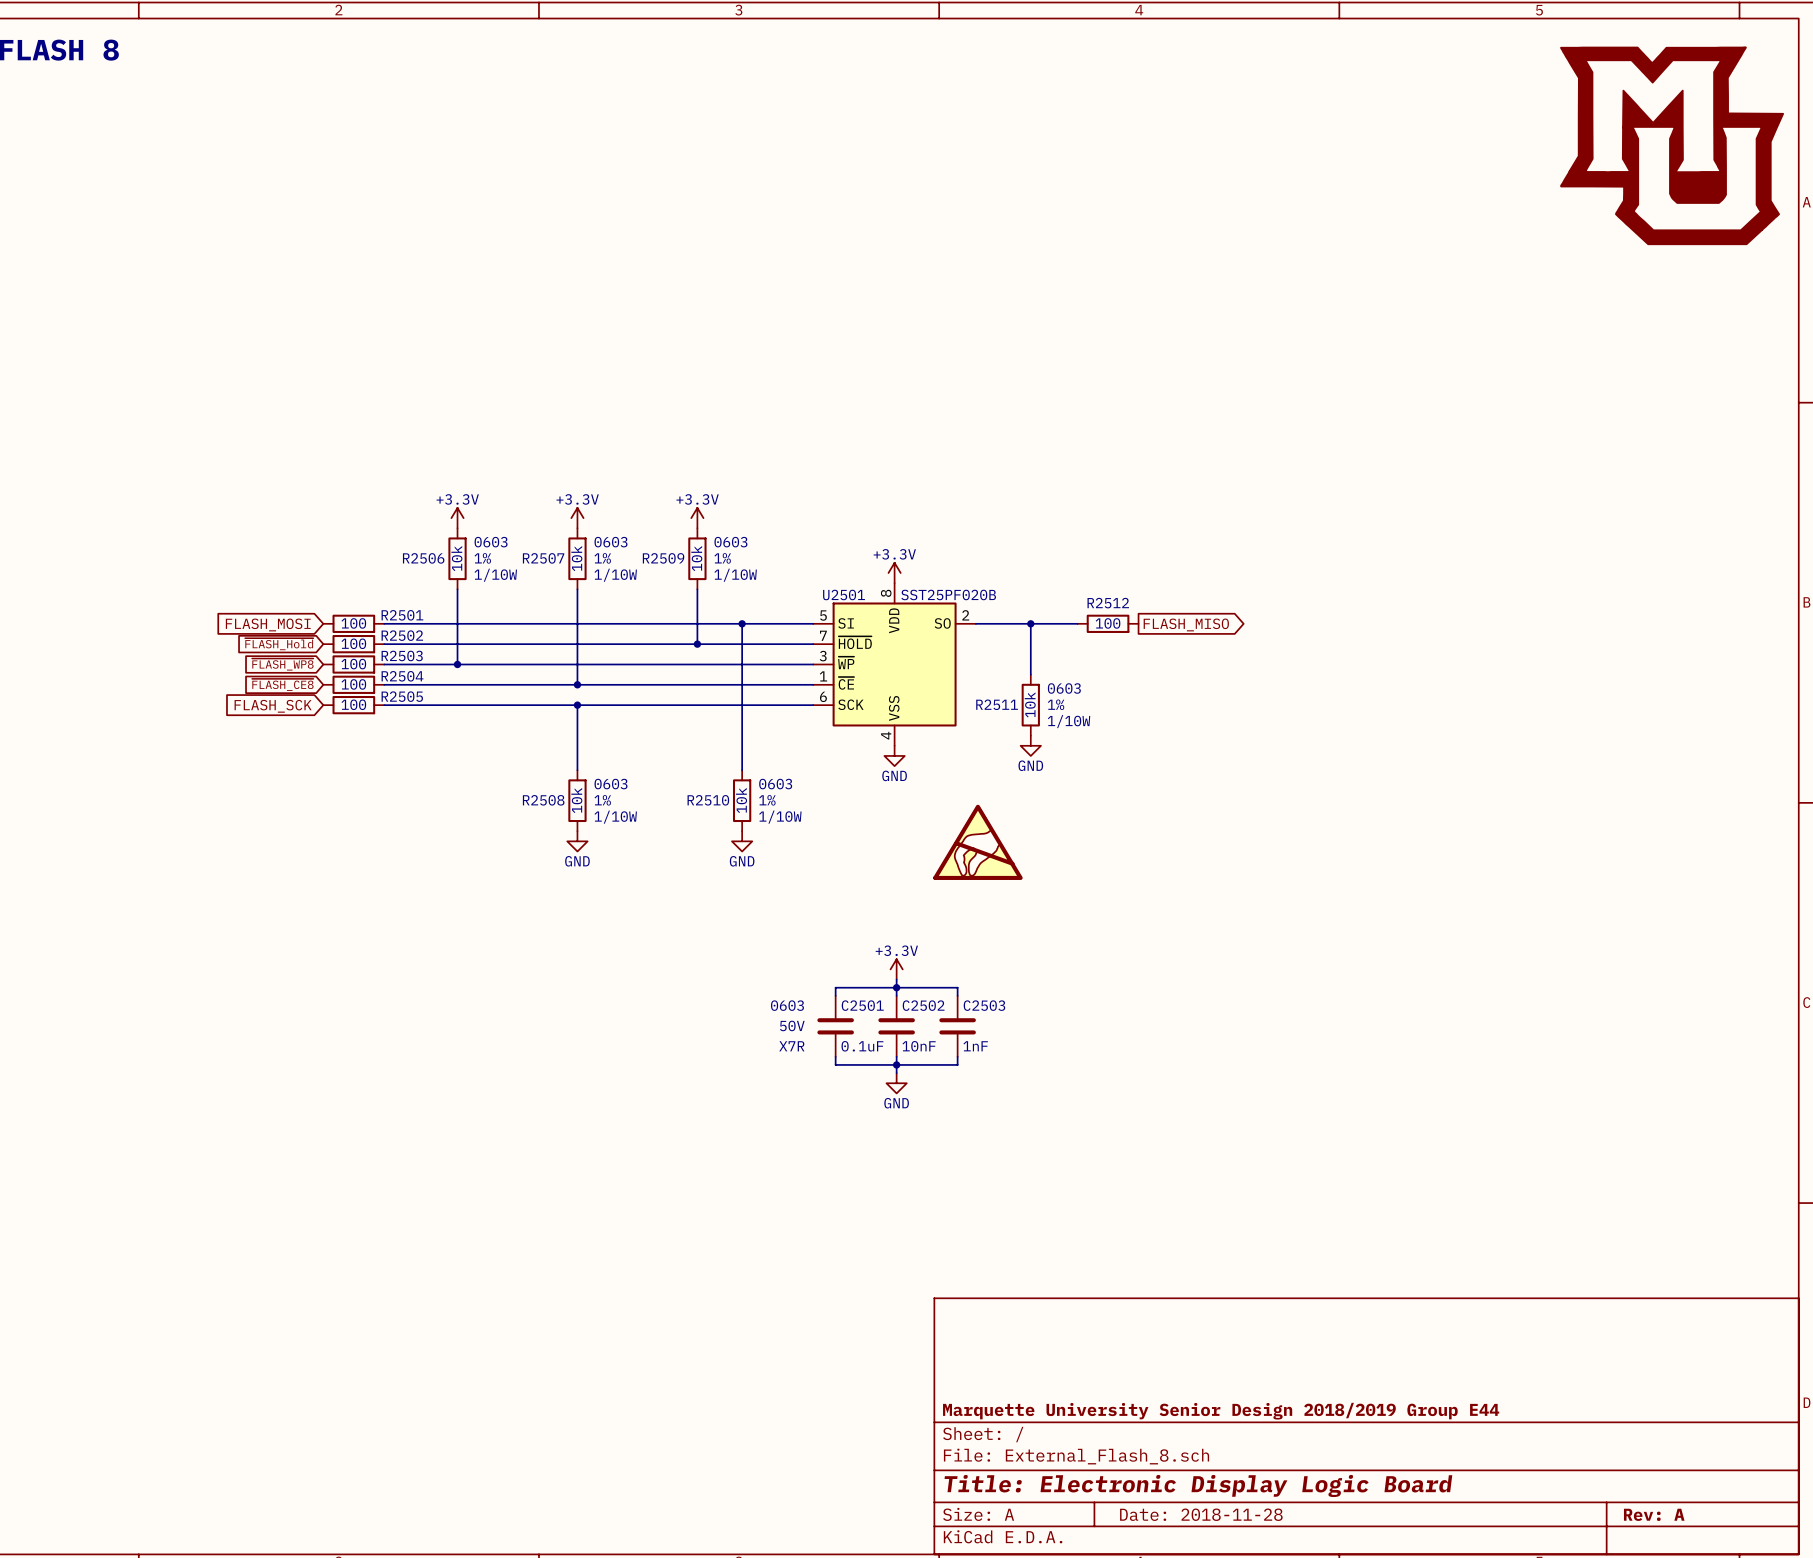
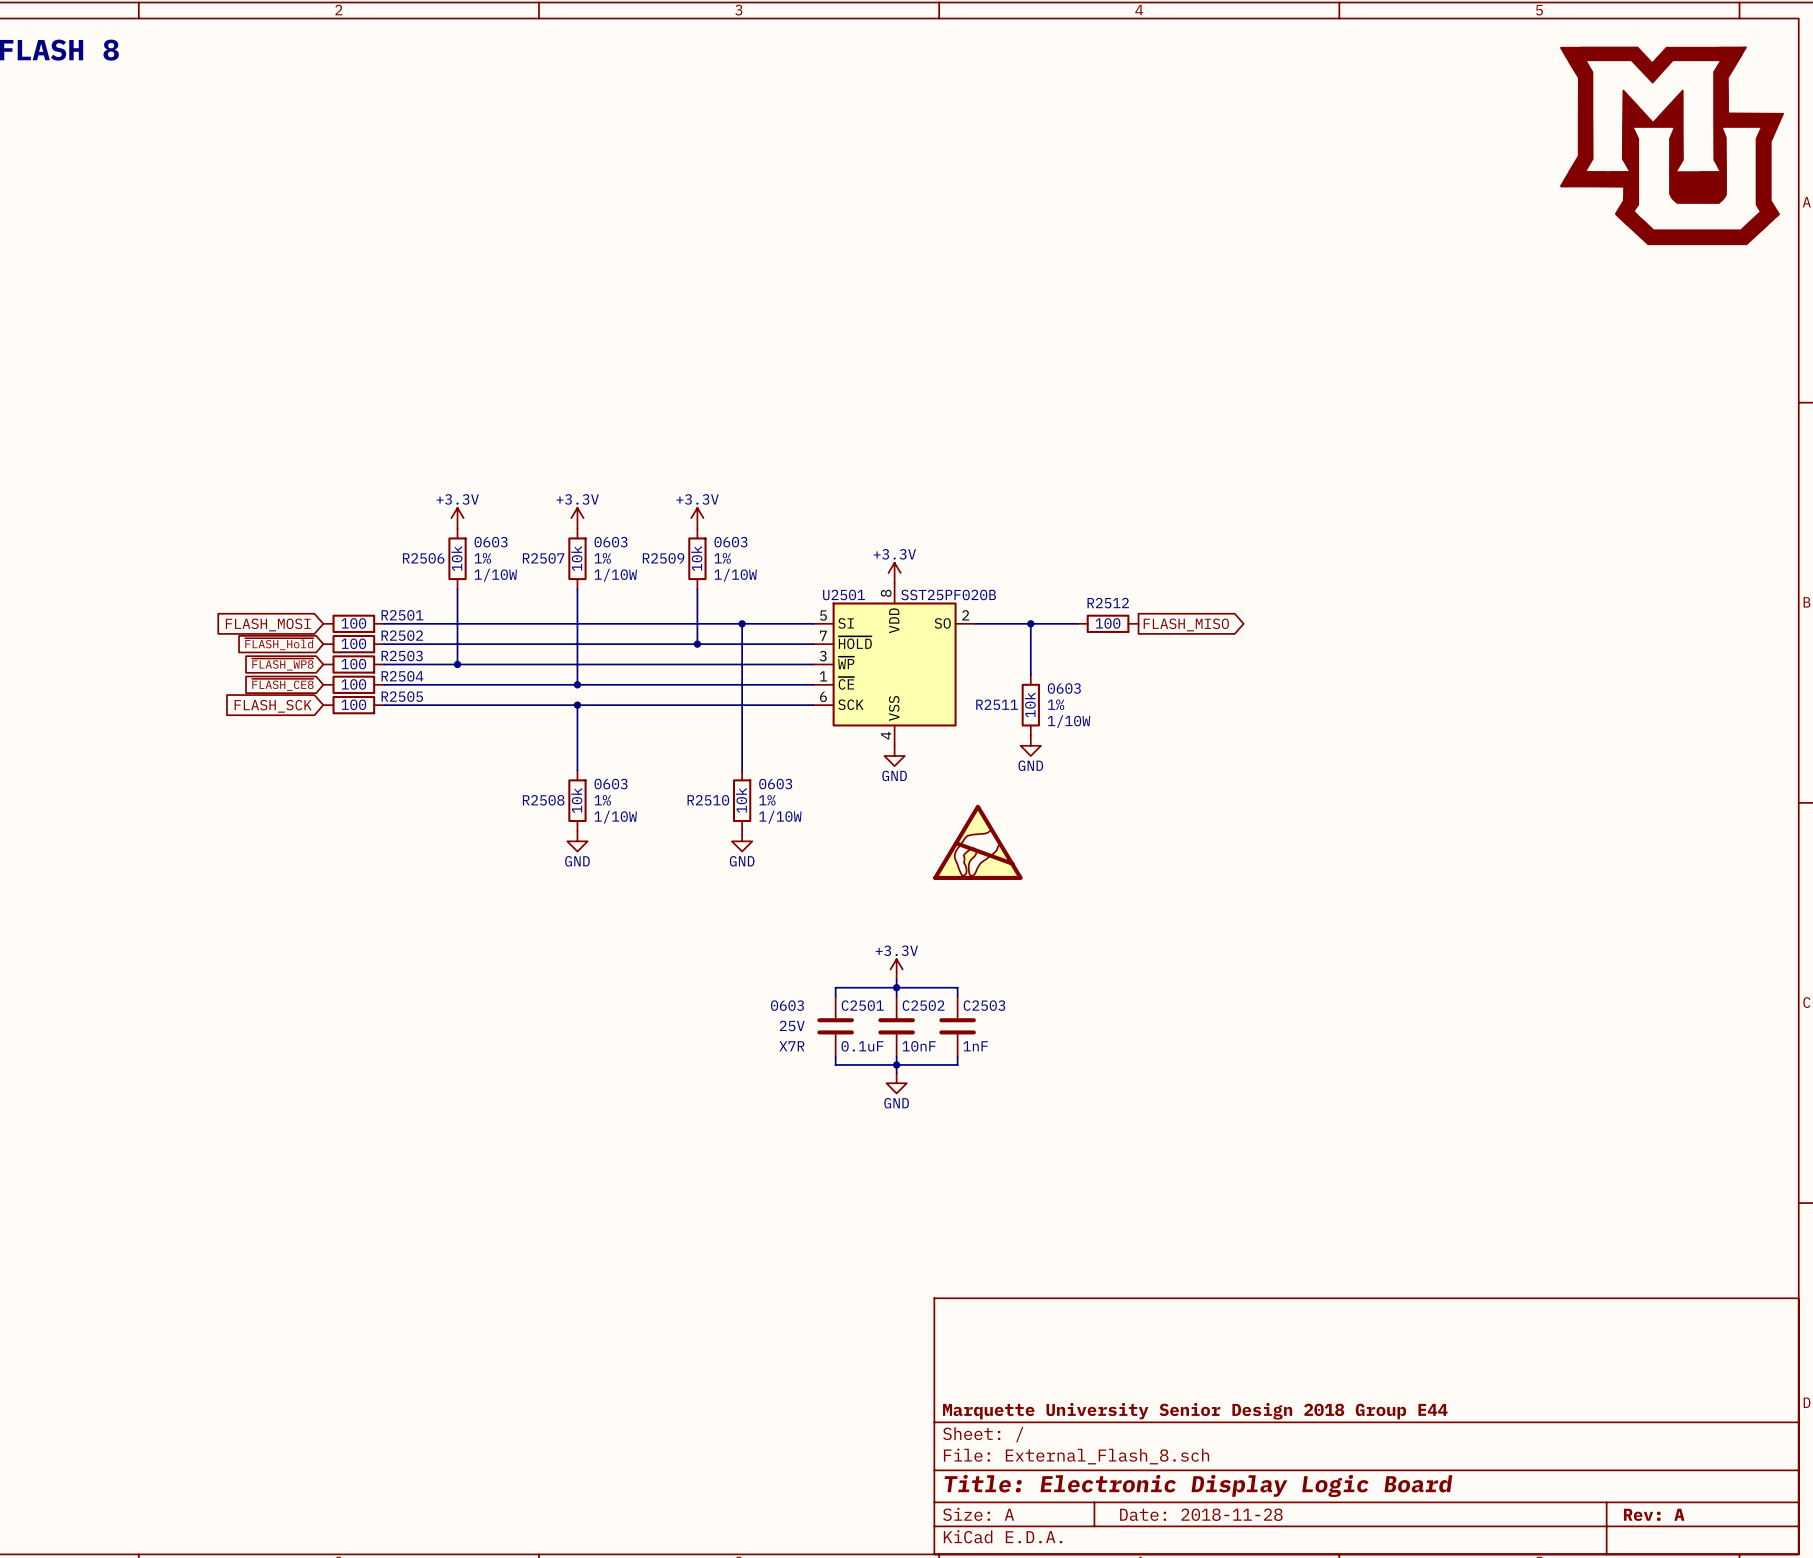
C2501 text: 50V (792, 1025) -> 25V (792, 1025)
title block: Marquette University Senior Design 2018/2019 Group E44 (1221, 1411) -> Marquette University Senior Design 2018 Group E44 (1195, 1411)

